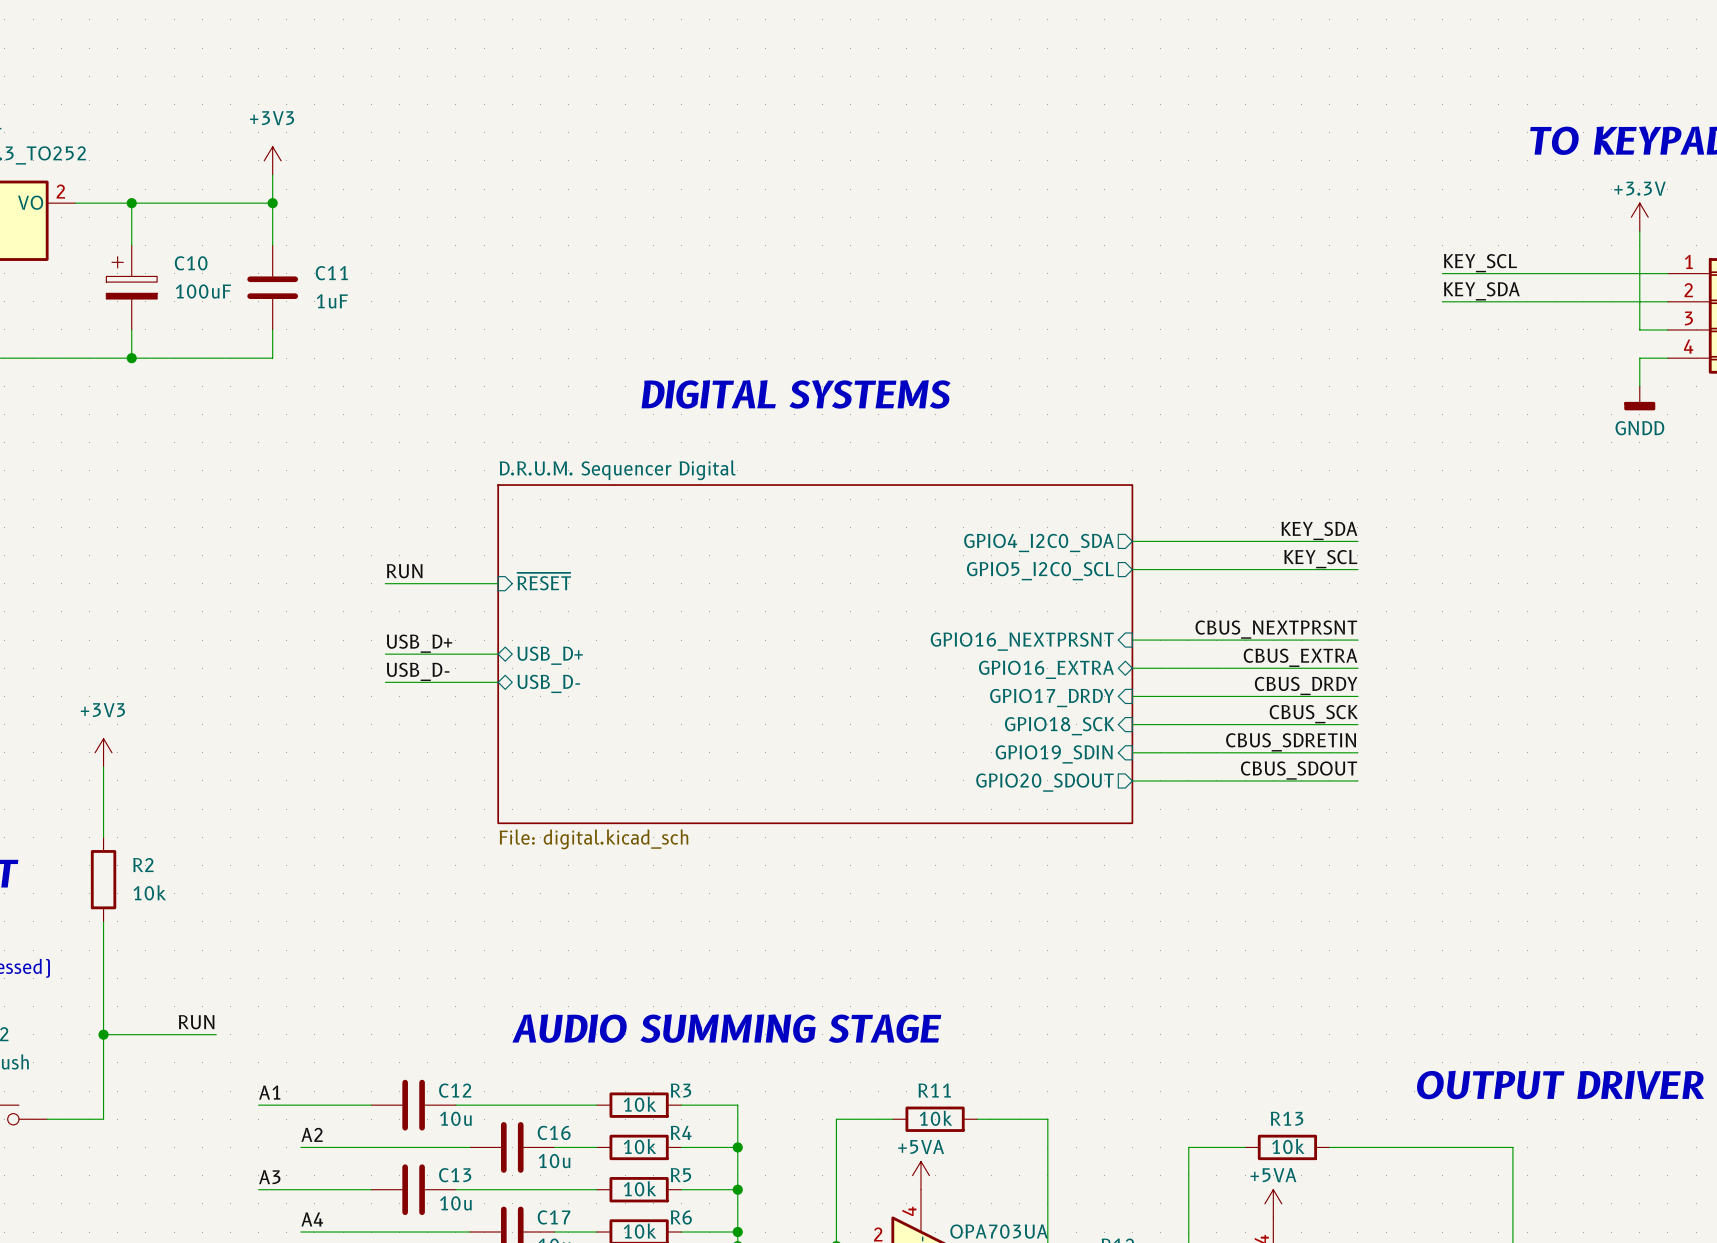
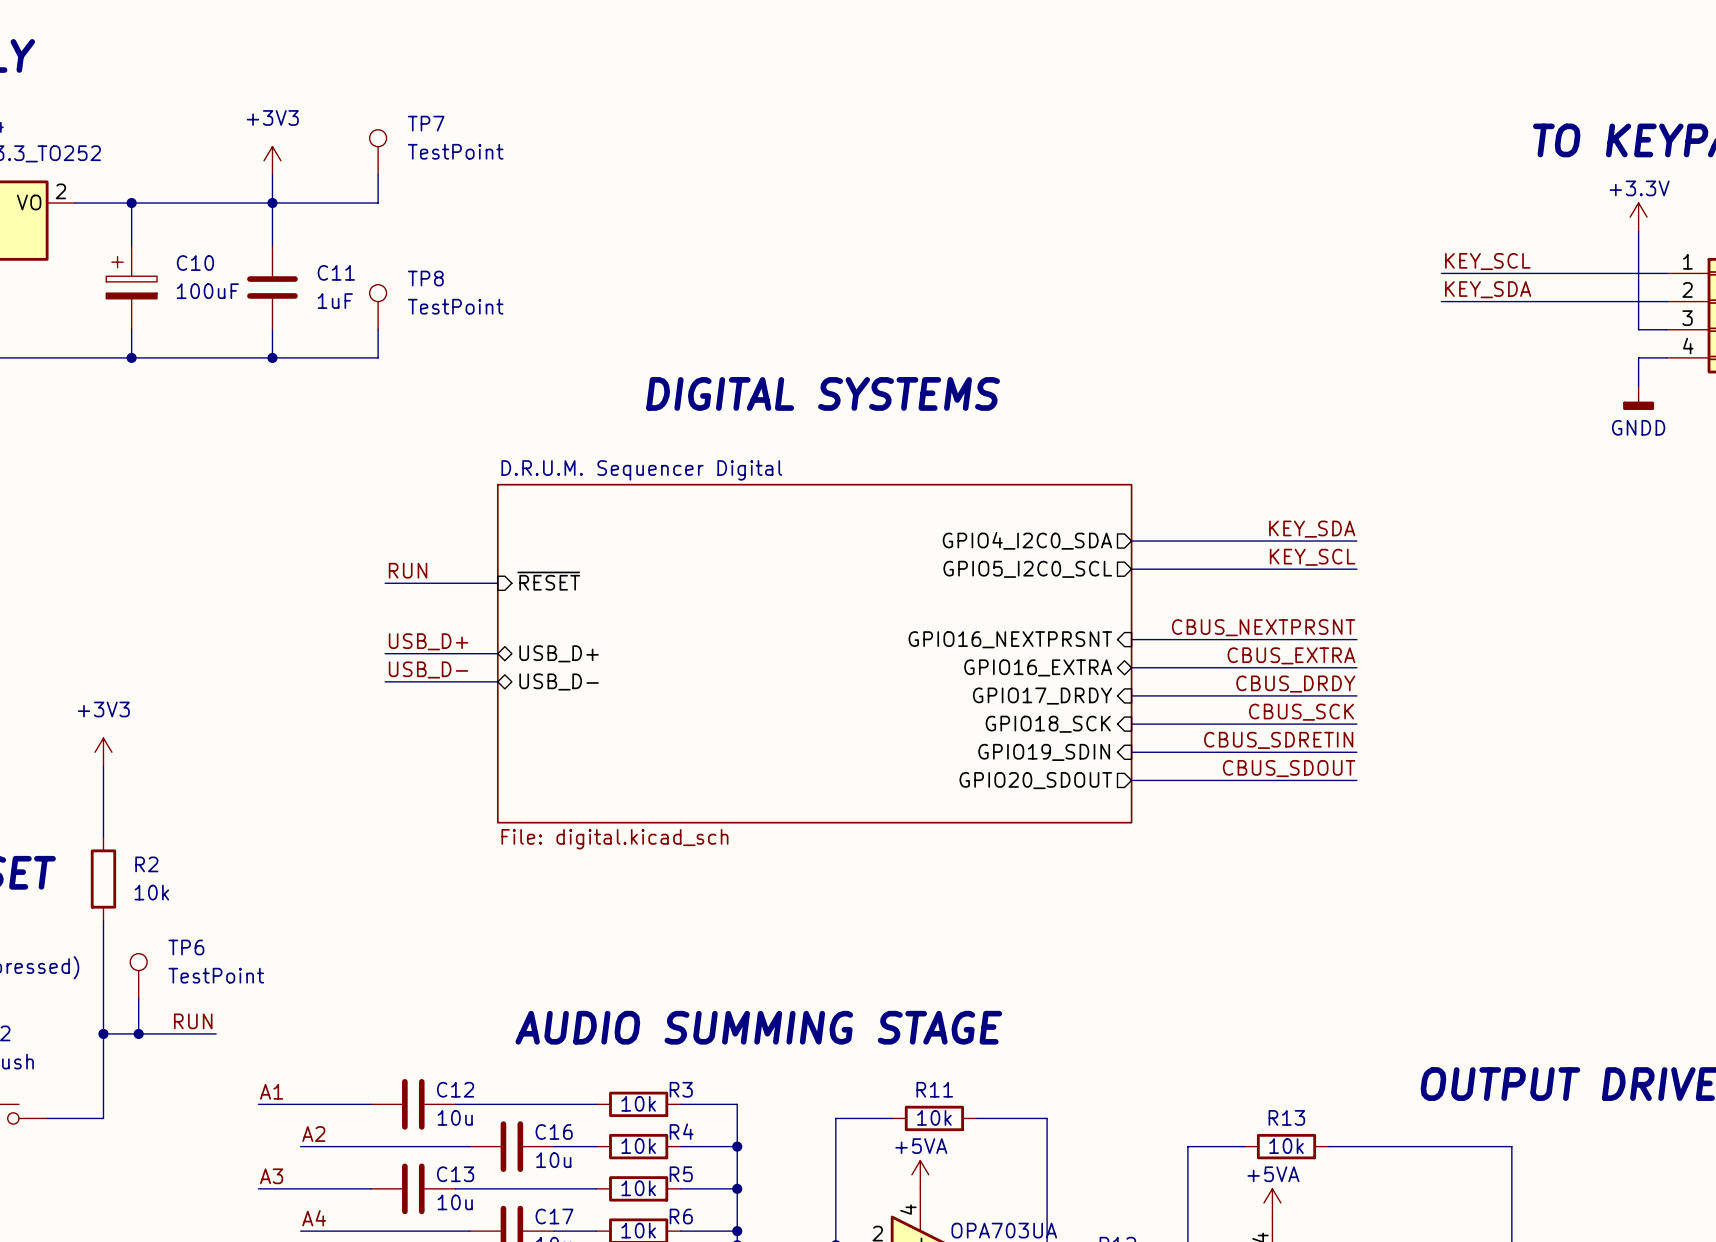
TP7: none -> TestPoint (378, 152)
wire: none -> (378, 174) (378, 203) (272, 203)
TP8: none -> TestPoint (378, 307)
wire: none -> (378, 329) (378, 357) (272, 357)
junction: none -> (272, 357)
TP6: none -> TestPoint (138, 976)
wire: none -> (138, 998) (138, 1033)
junction: none -> (138, 1033)

